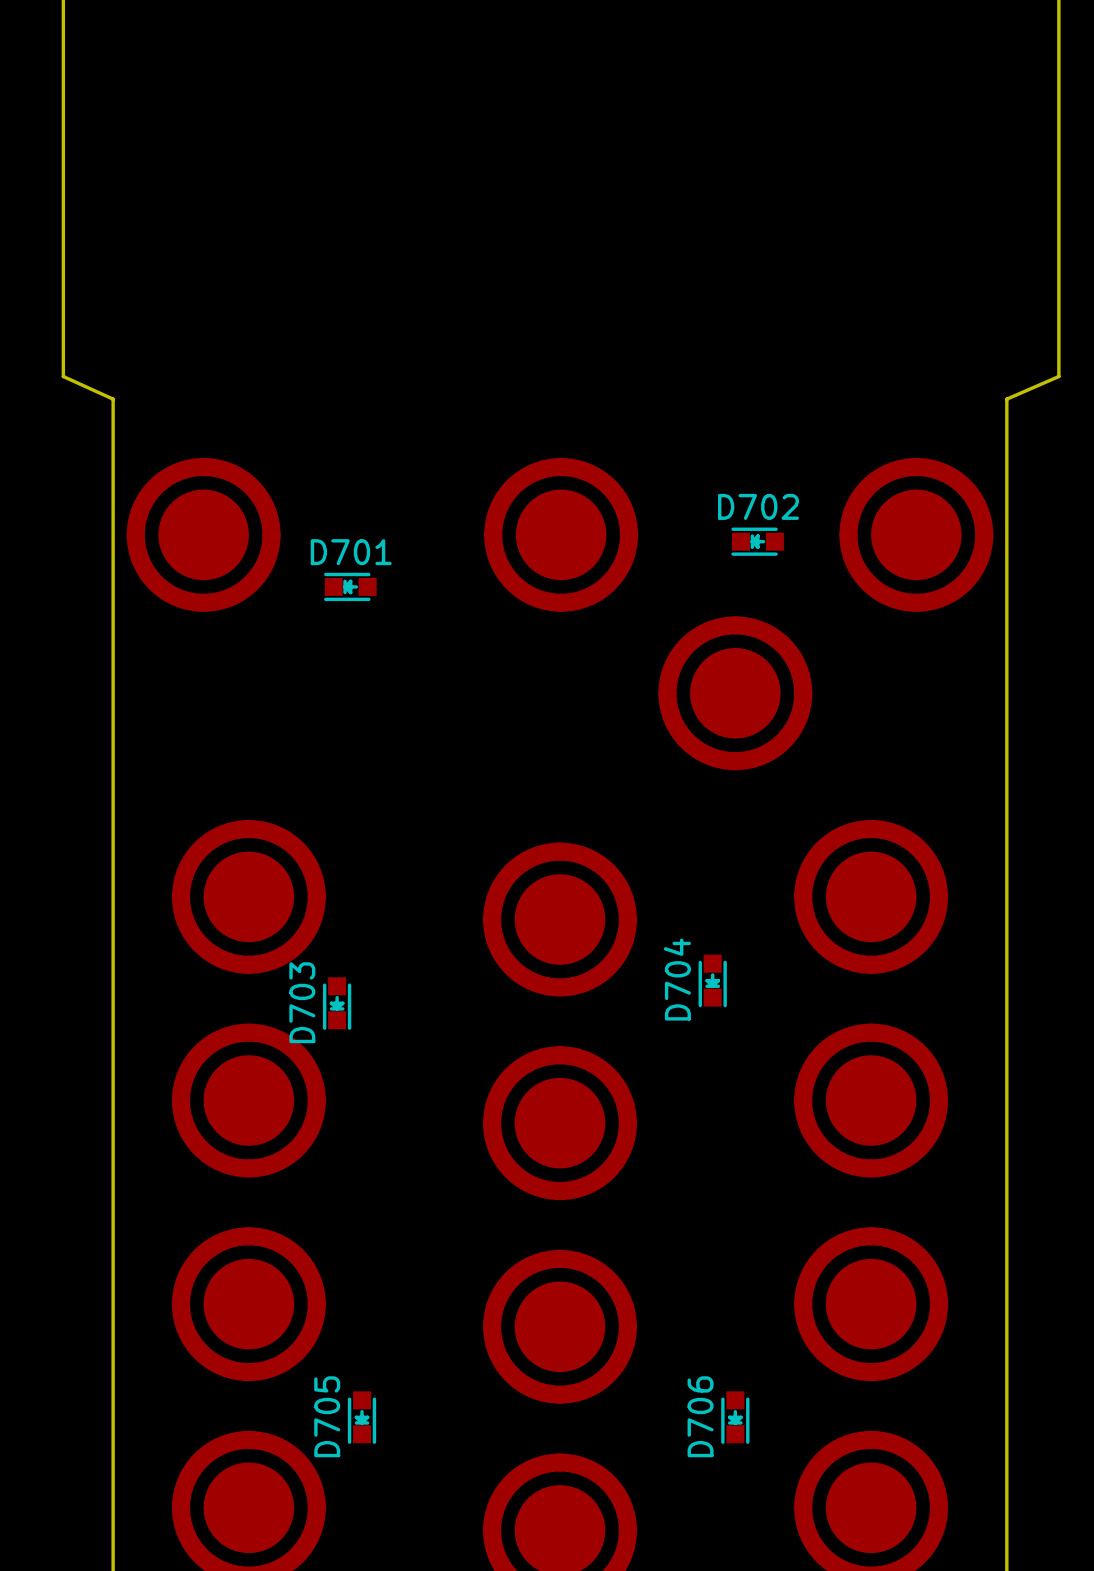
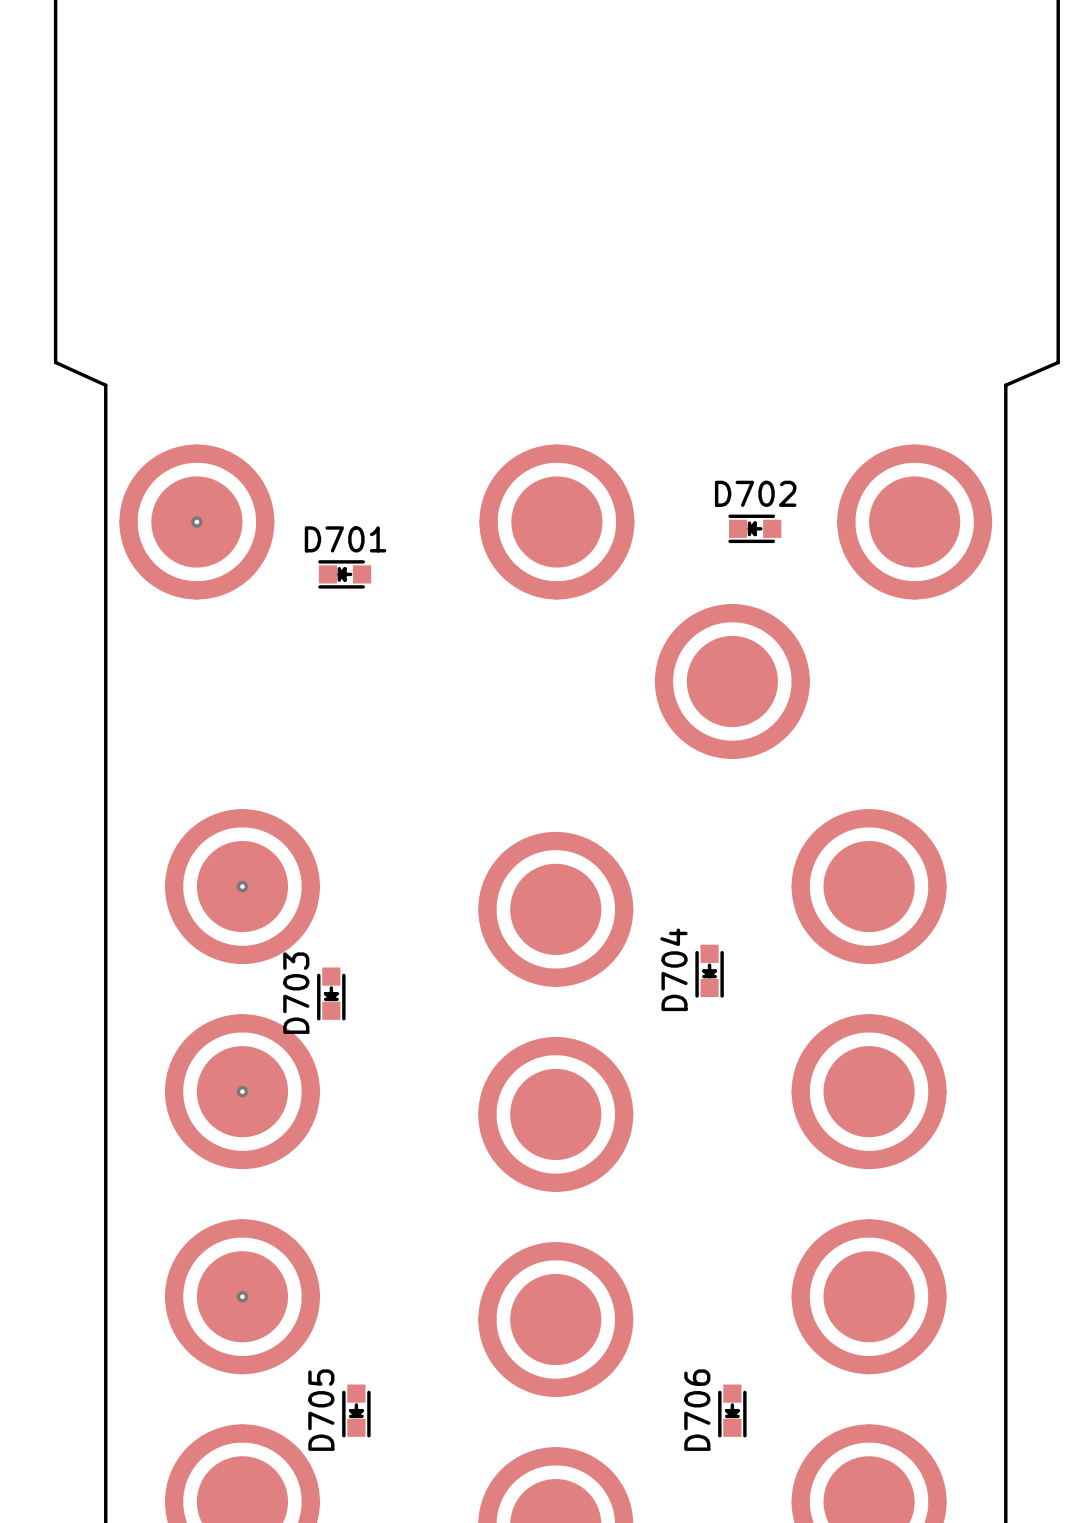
via: none -> (196, 522)
via: none -> (242, 886)
via: none -> (242, 1091)
via: none -> (242, 1296)

